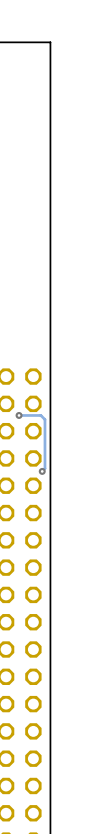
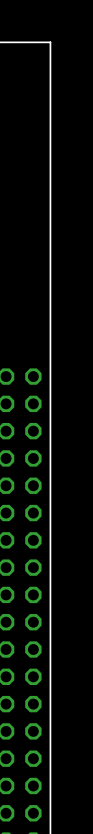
track: (19, 415) (40, 415) (44, 419) (44, 468) (42, 471) -> none
via: (19, 415) -> none
via: (42, 471) -> none

